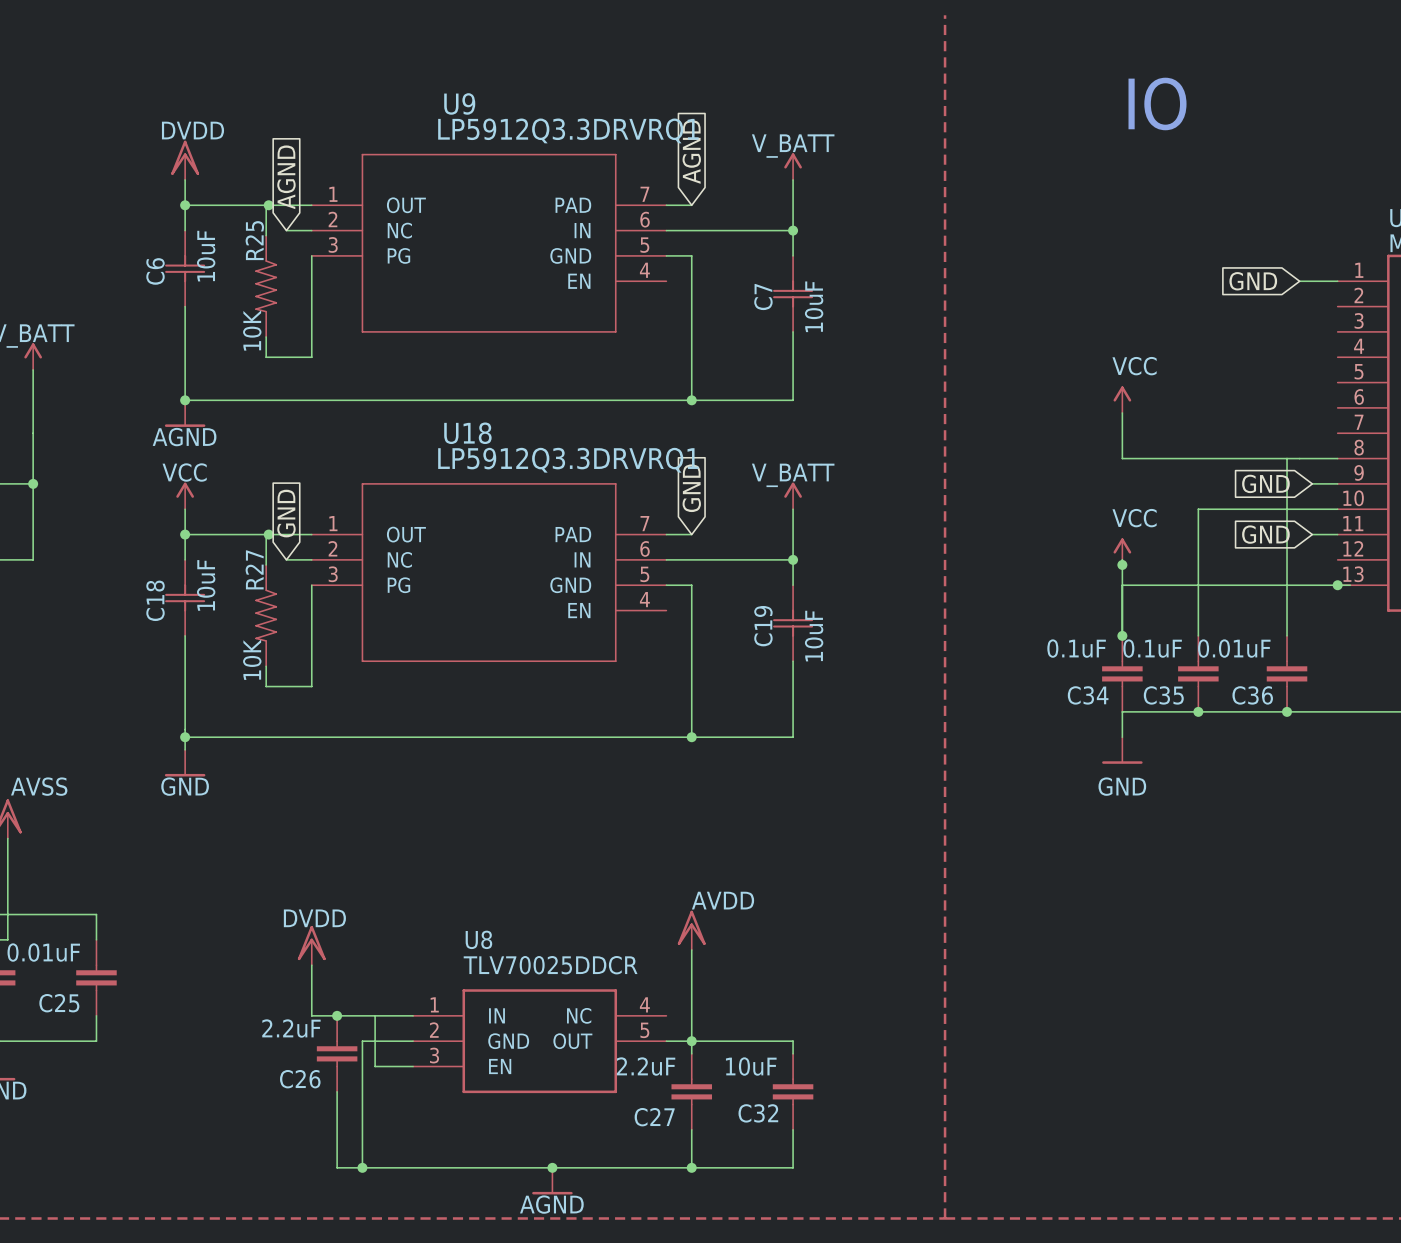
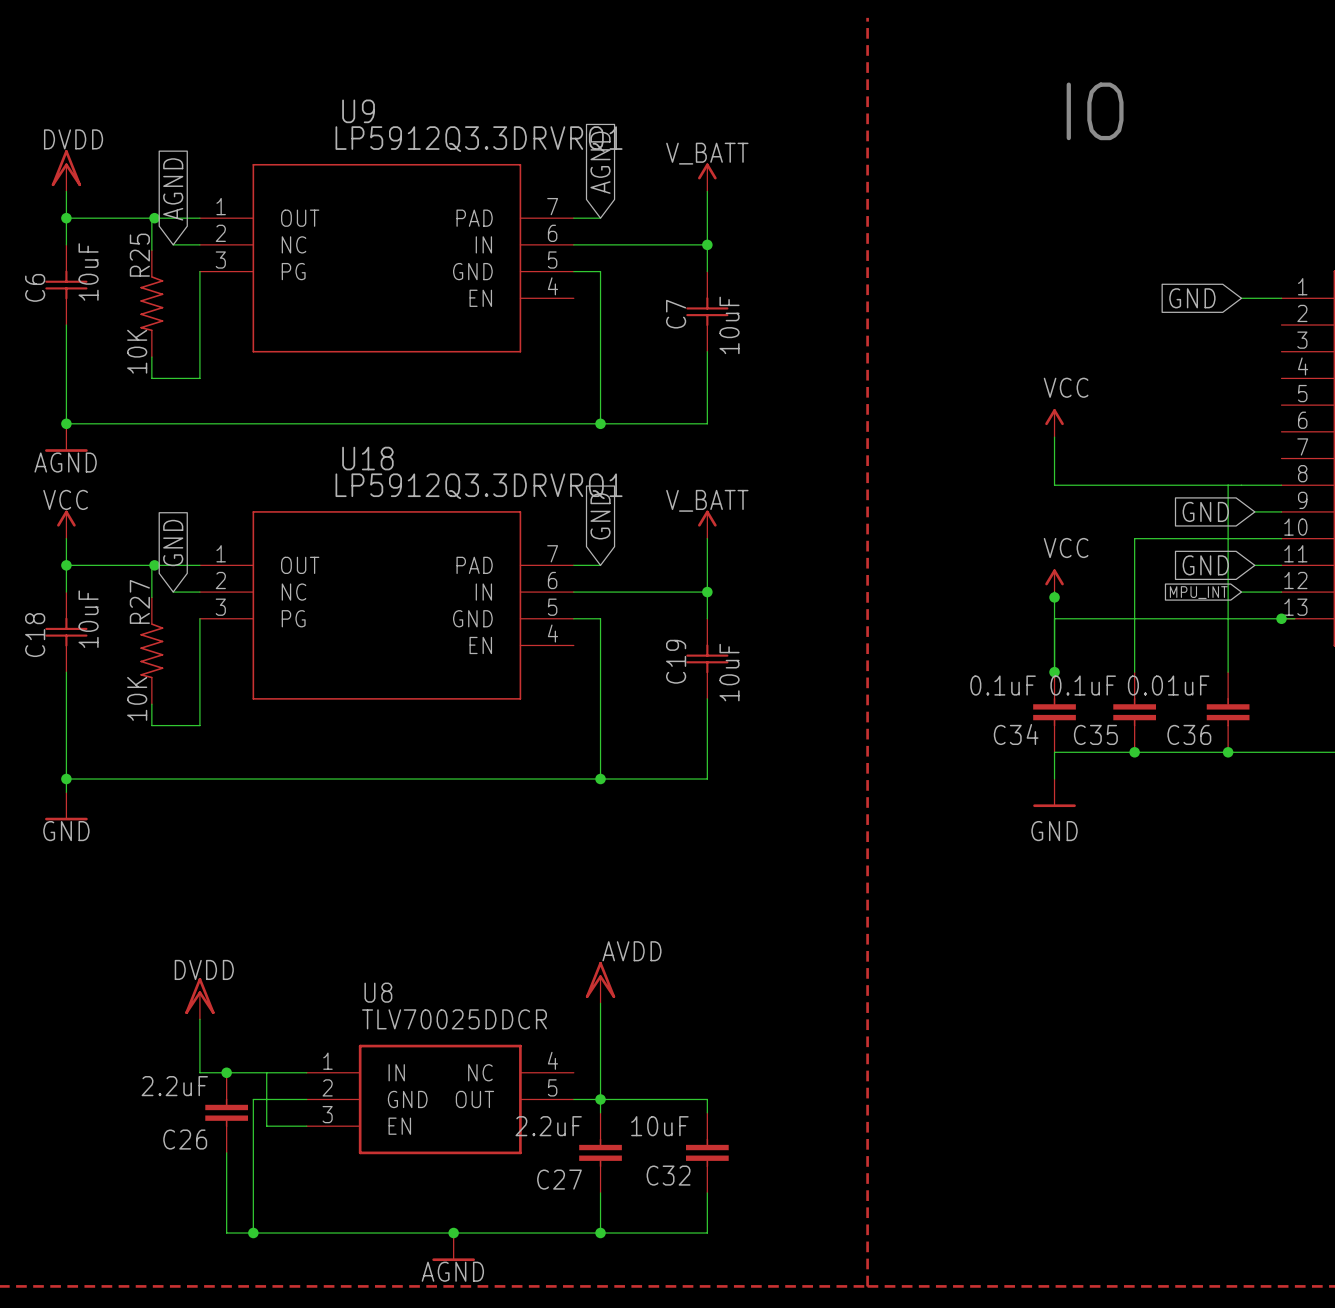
wire: none -> (1241, 592) (1281, 592)
global label: none -> MPU_INT (1198, 592)

